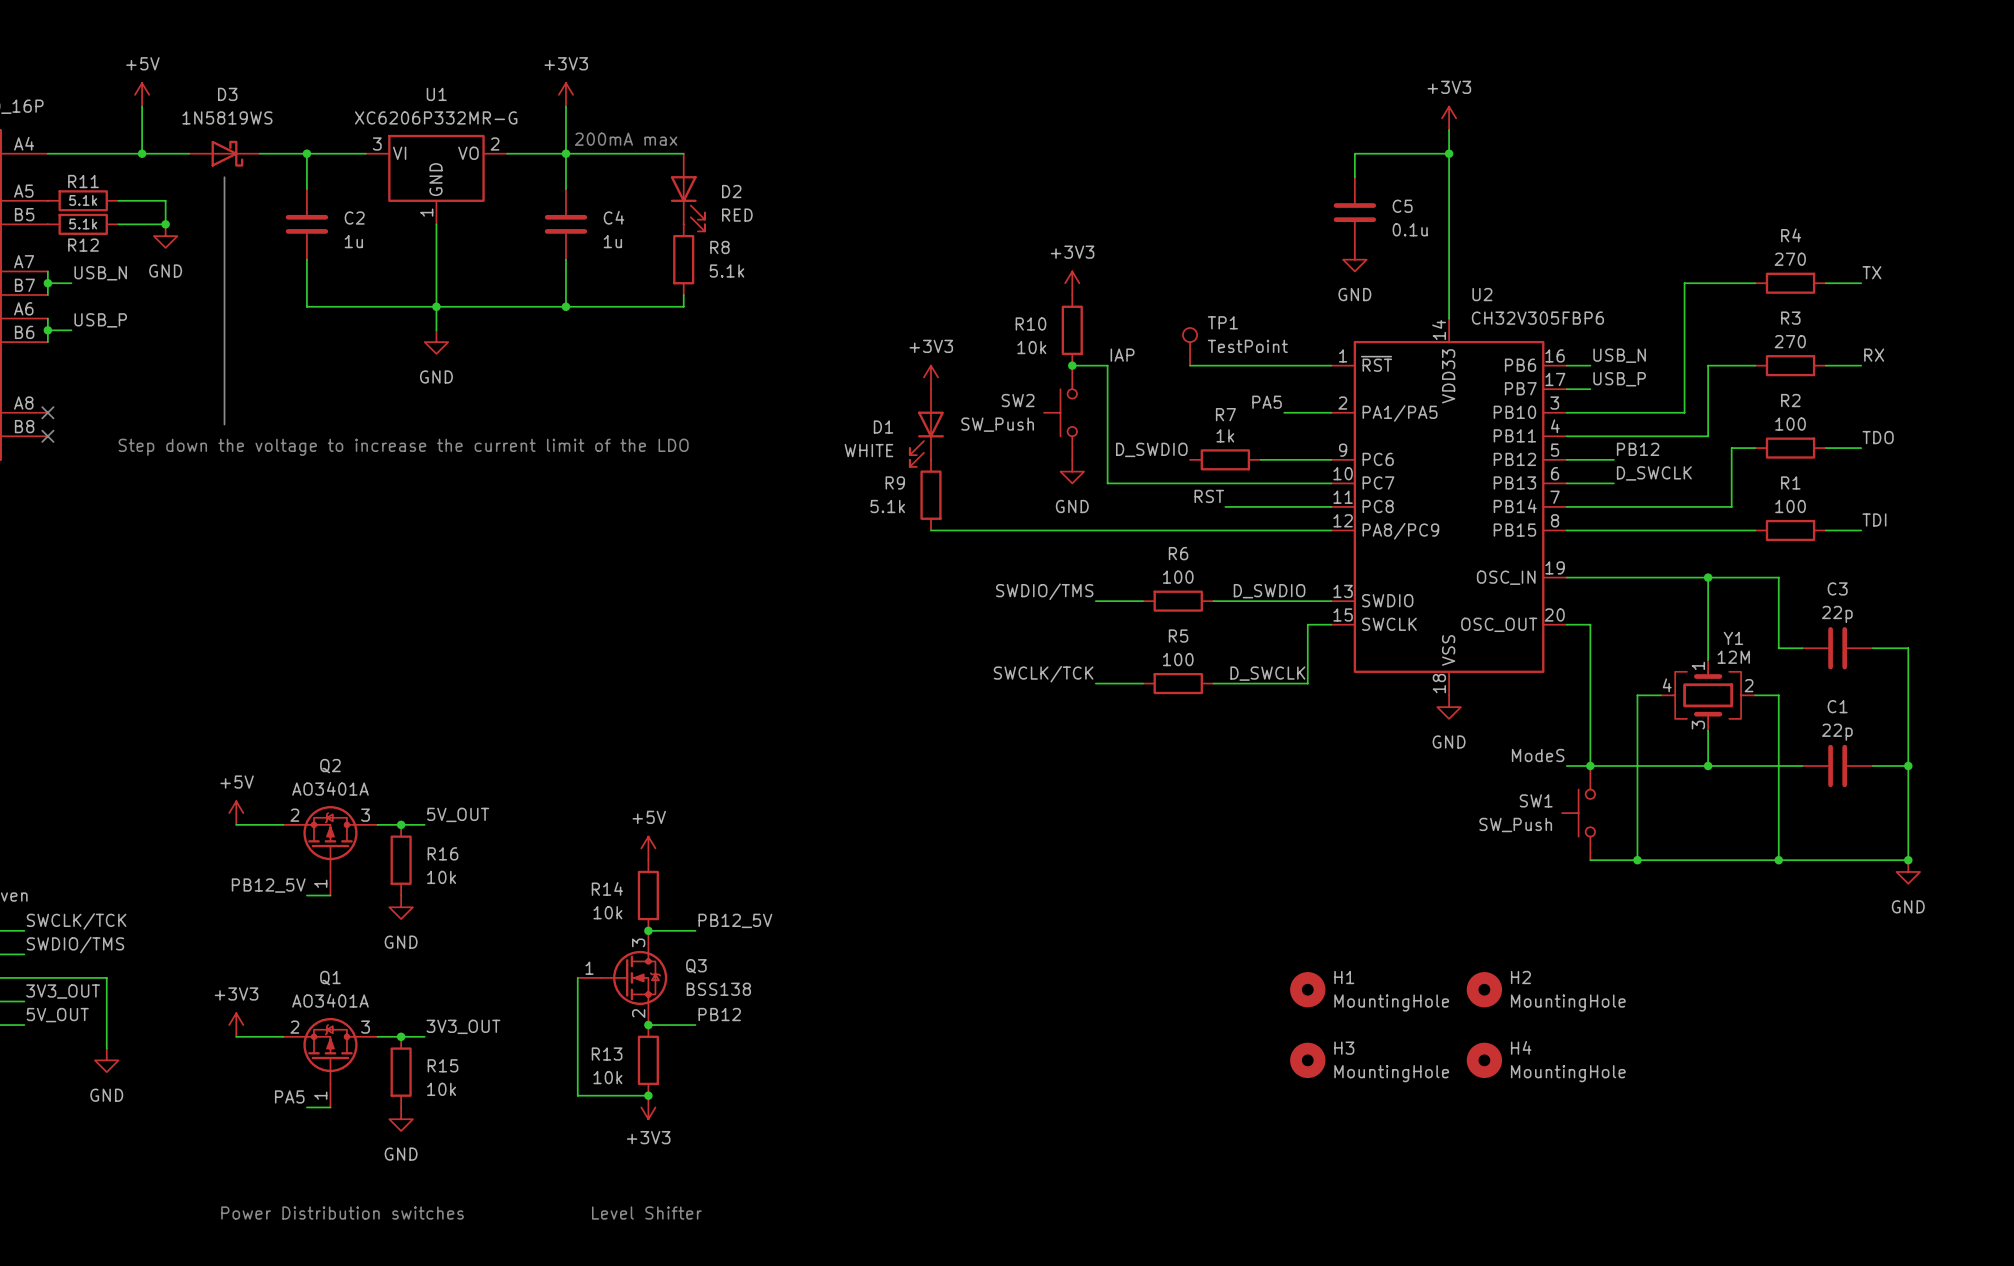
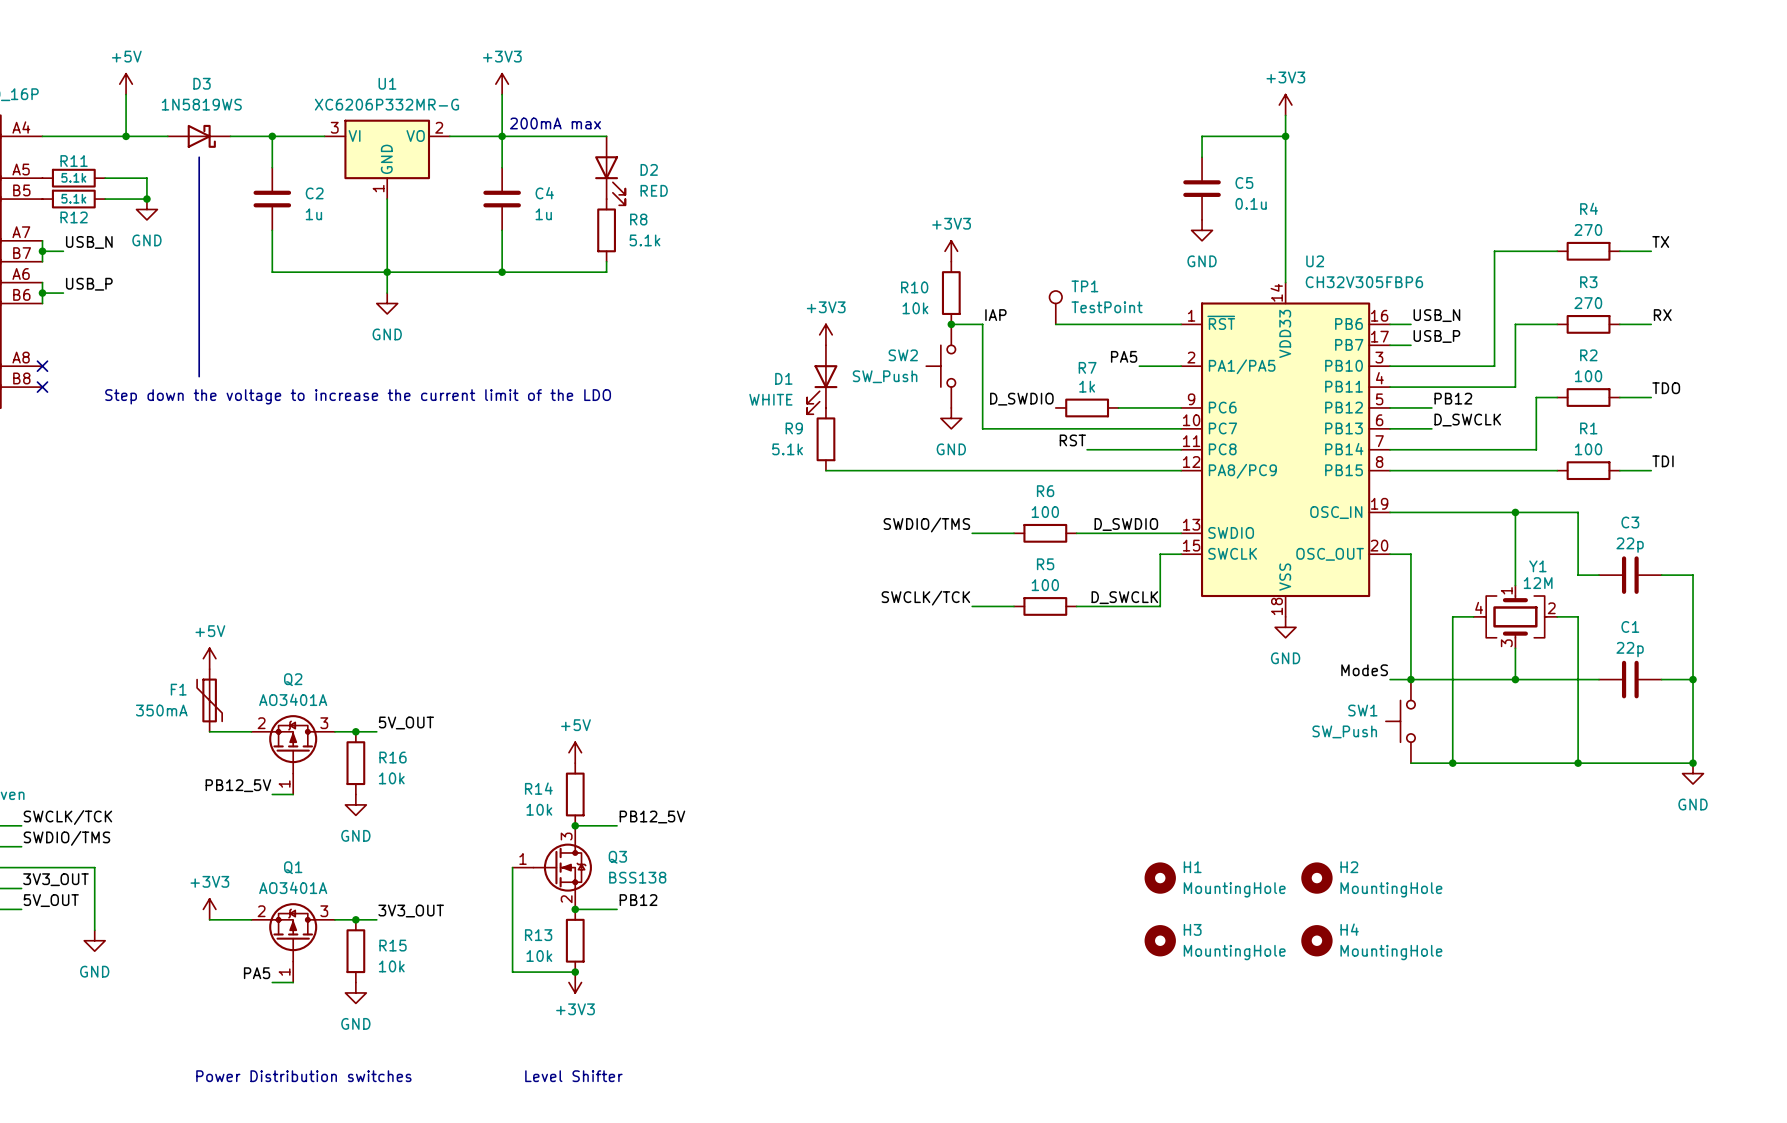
F1: none -> 350mA (209, 700)
power symbol position: +5V (236, 813) -> +5V (209, 658)

